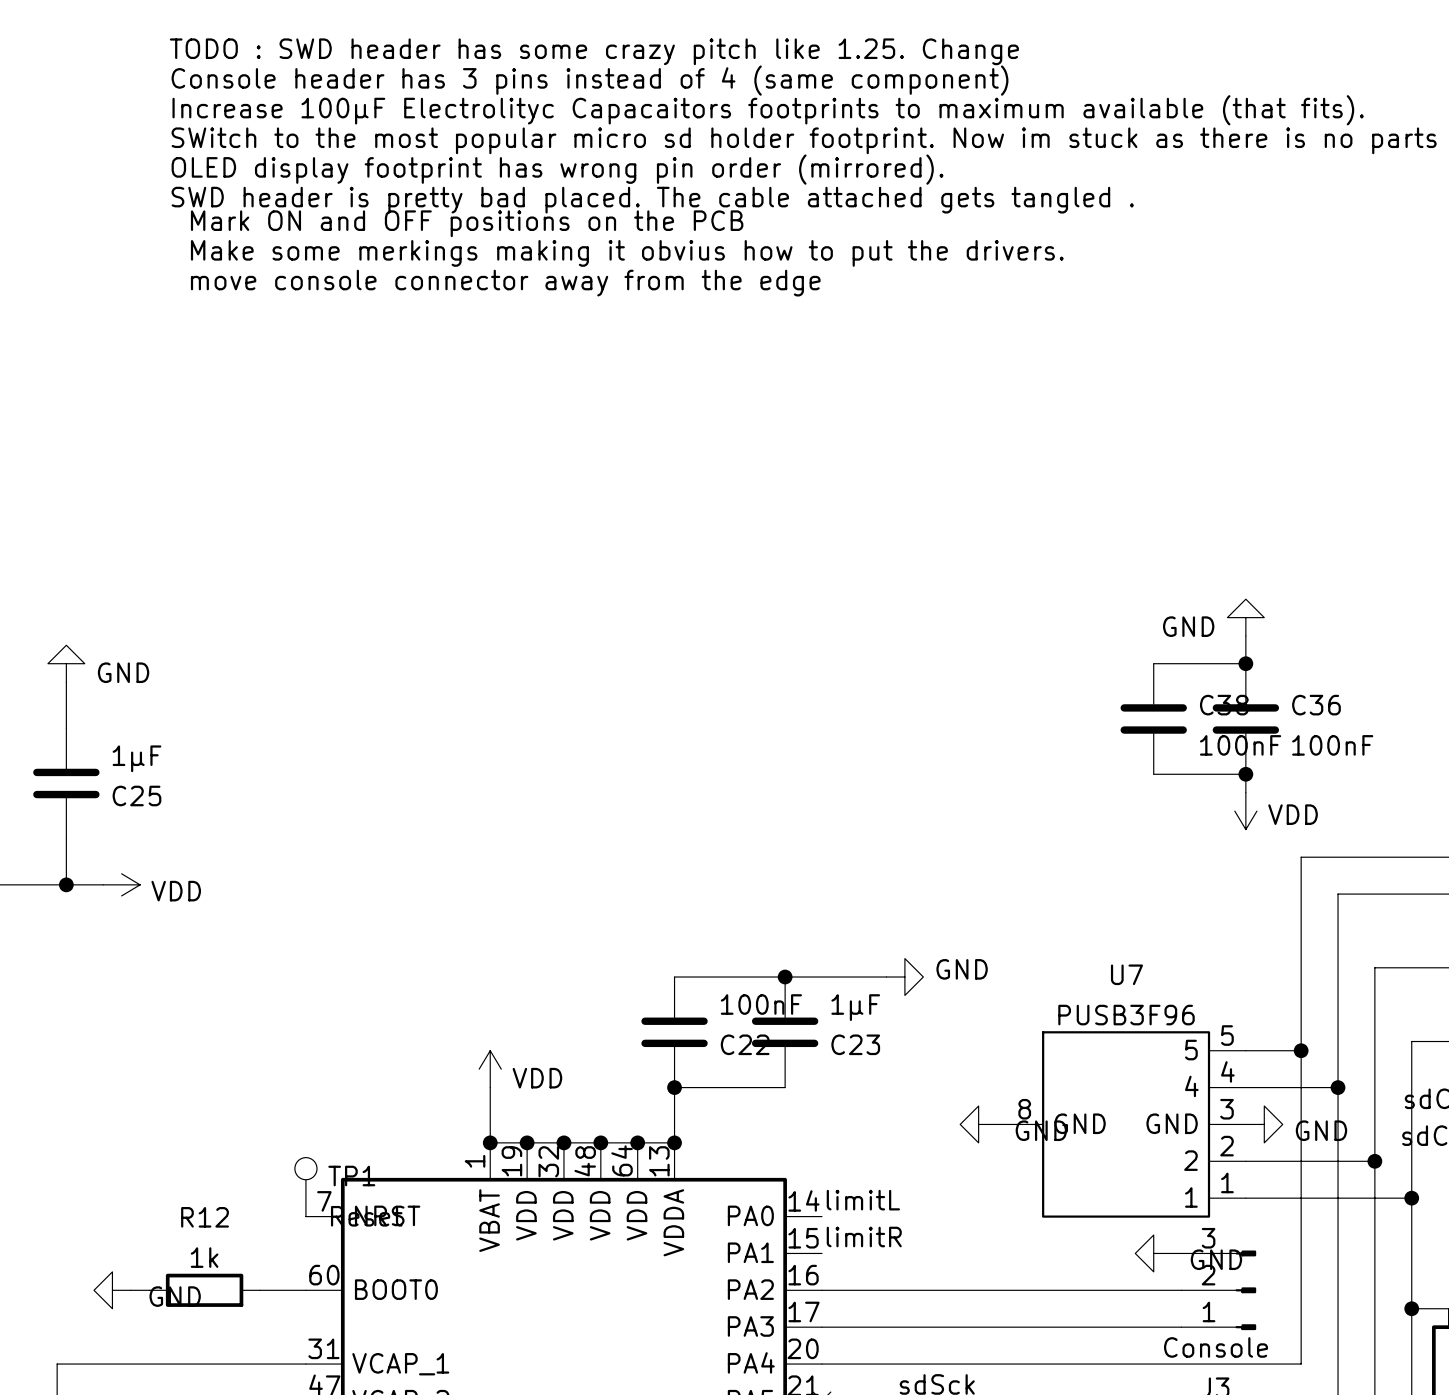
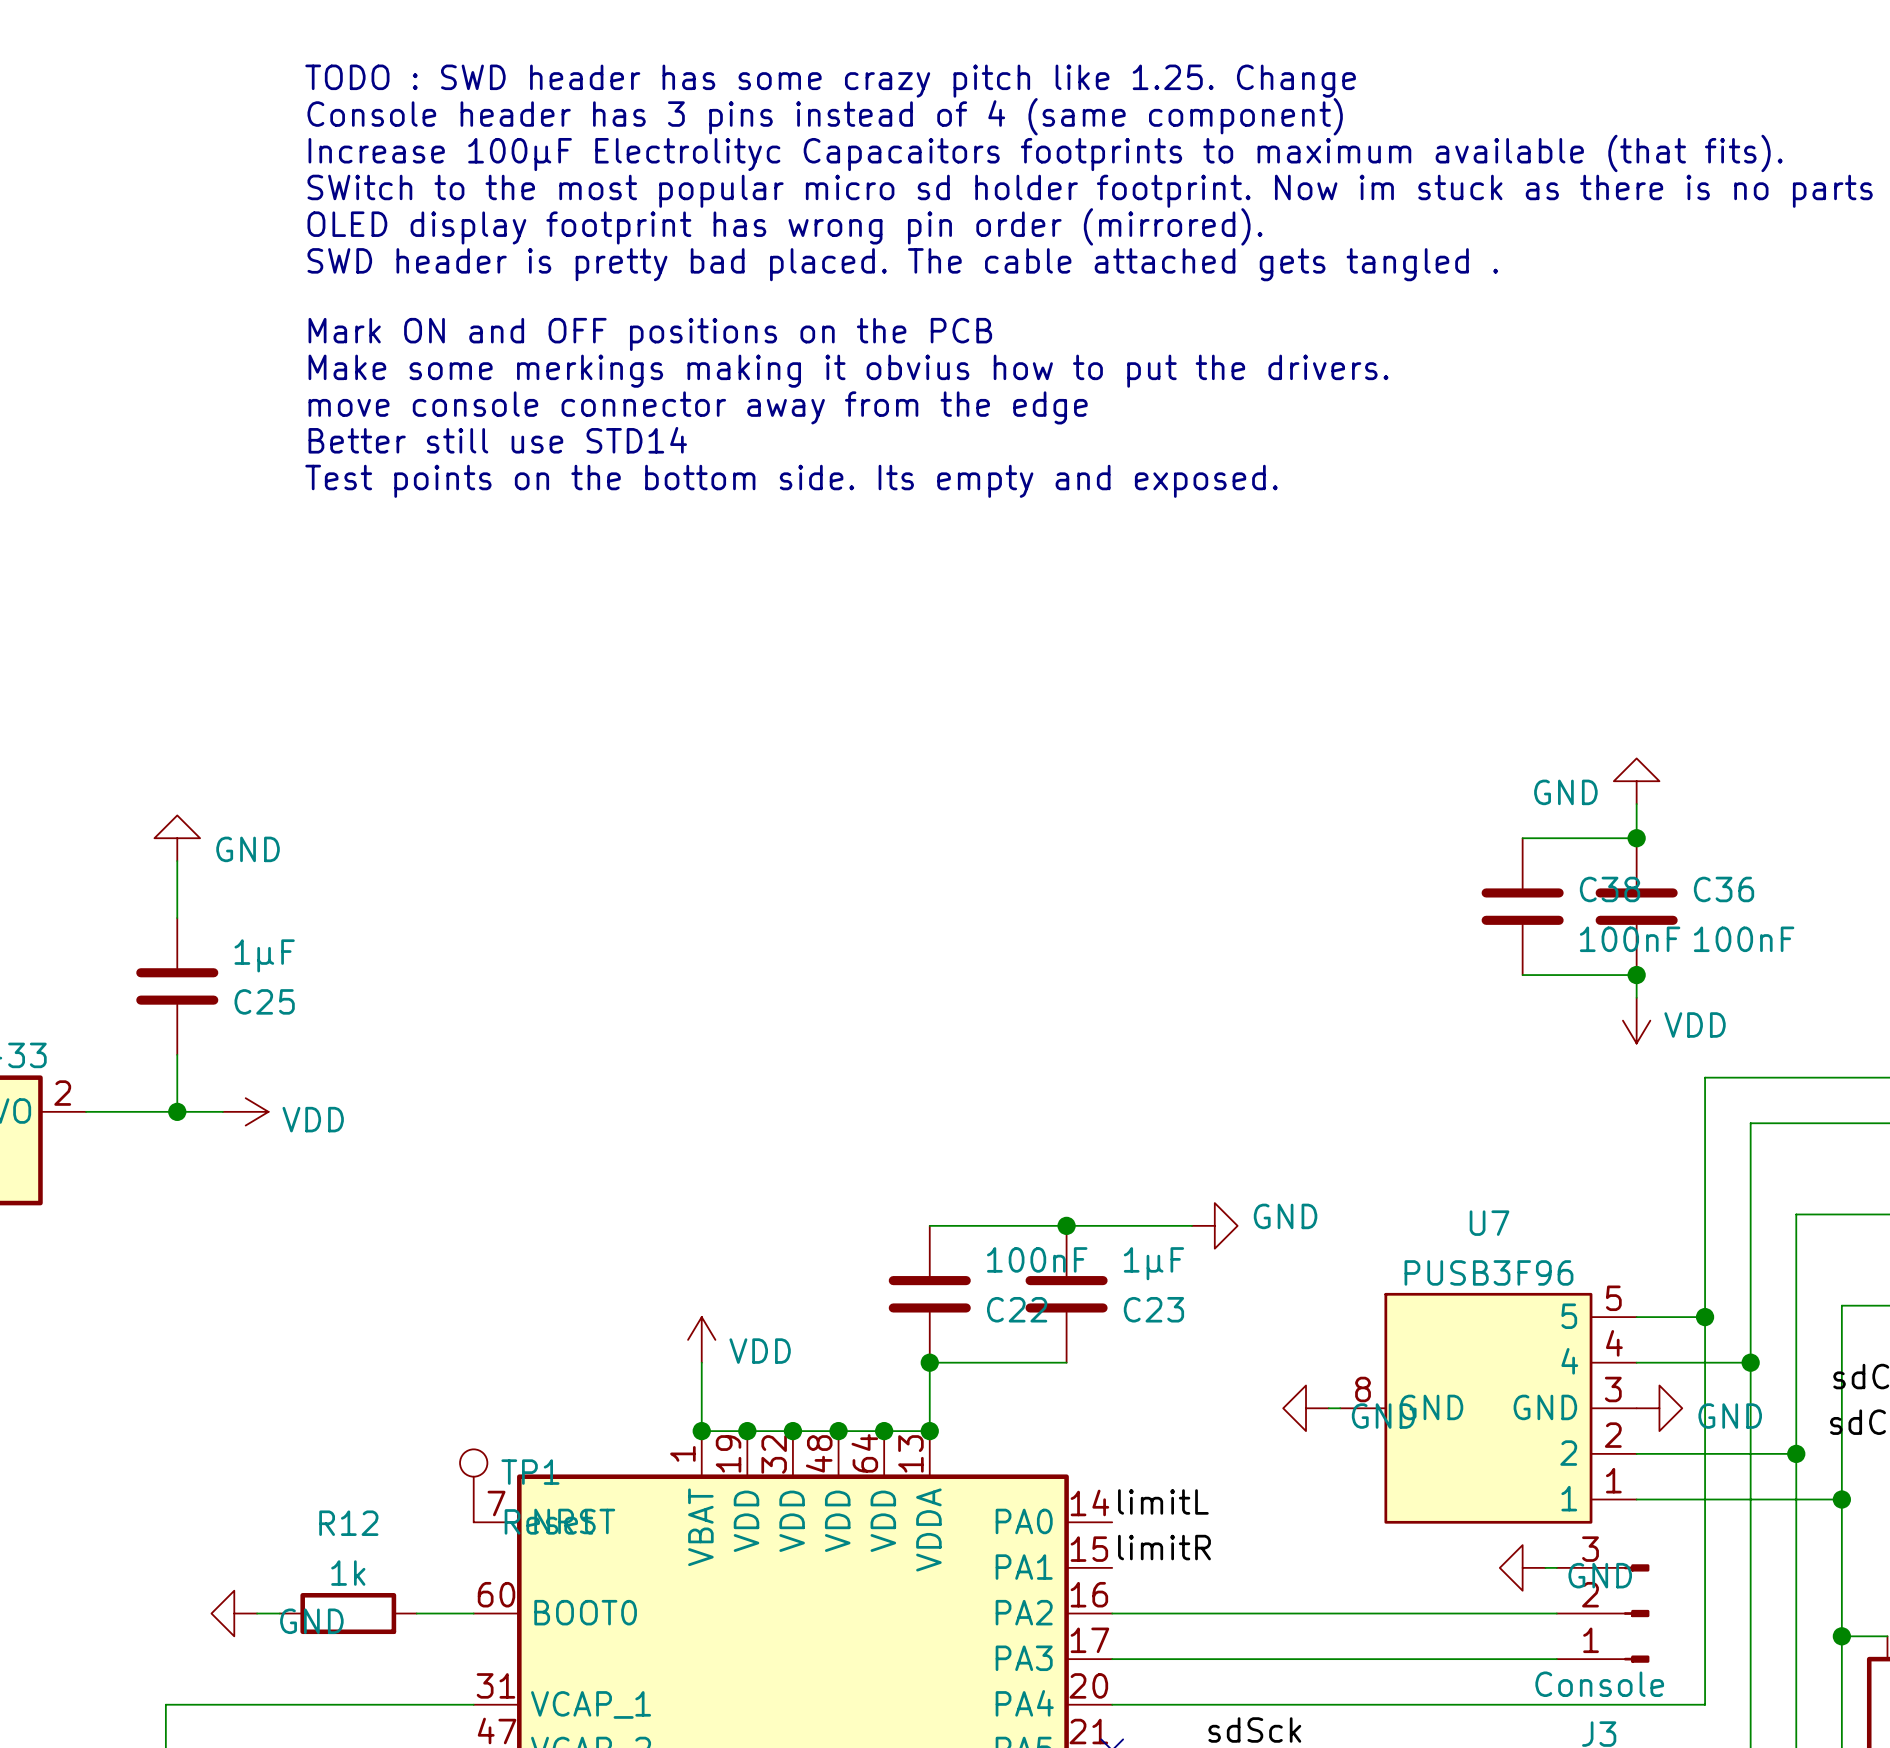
text position: Mark ON and OFF positions on the PCB (467, 223) -> Mark ON and OFF positions on the PCB (650, 334)
text position: Make some merkings making it obvius how to put the drivers. (627, 253) -> Make some merkings making it obvius how to put the drivers. (848, 371)
text position: move console connector away from the edge (505, 283) -> move console connector away from the edge (698, 407)
text: none -> Better still use STD14 (497, 440)
text: none -> Test points on the bottom side. Its empty and exposed. (791, 481)

